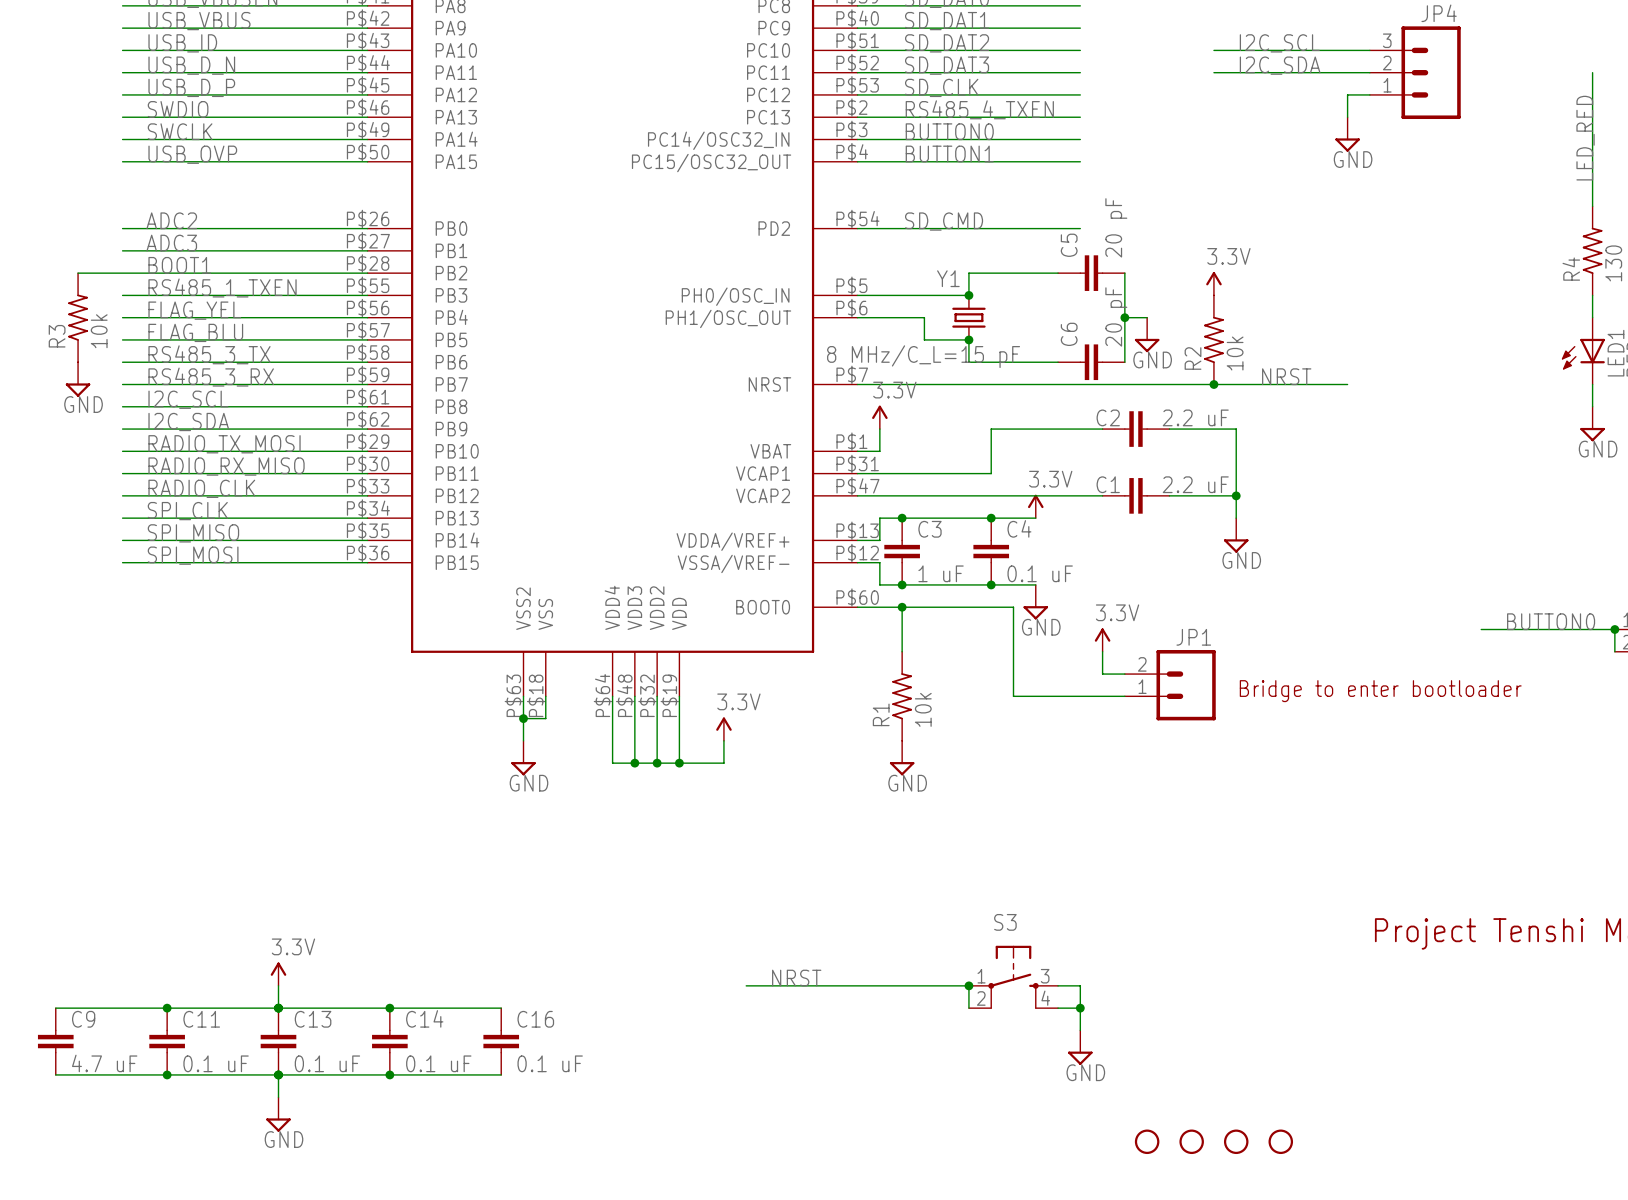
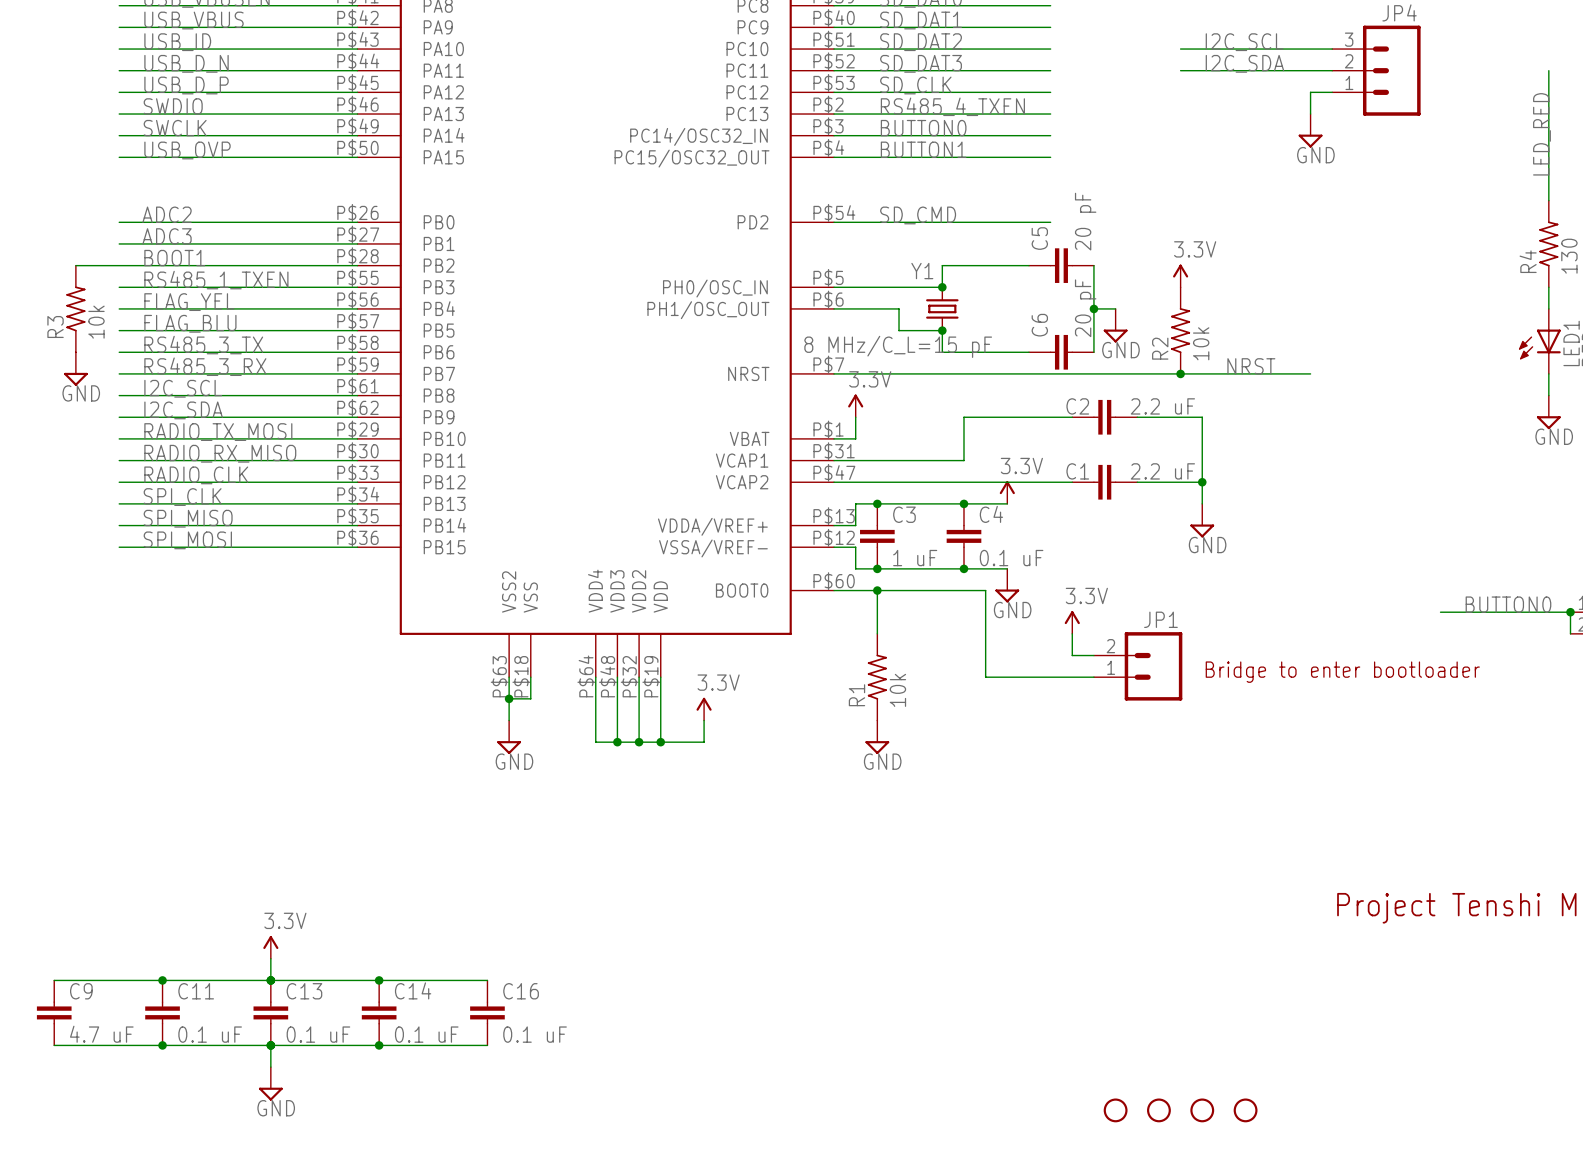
S3: (1013, 977) -> none
label: NRST (796, 978) -> none
wire: (746, 985) (968, 985) (968, 1008) -> none
junction: (968, 985) -> none
wire: (1058, 985) (1080, 985) (1080, 1030) -> none
wire: (1058, 1008) (1080, 1008) -> none
junction: (1080, 1008) -> none
power symbol: GND (1080, 1047) -> none

